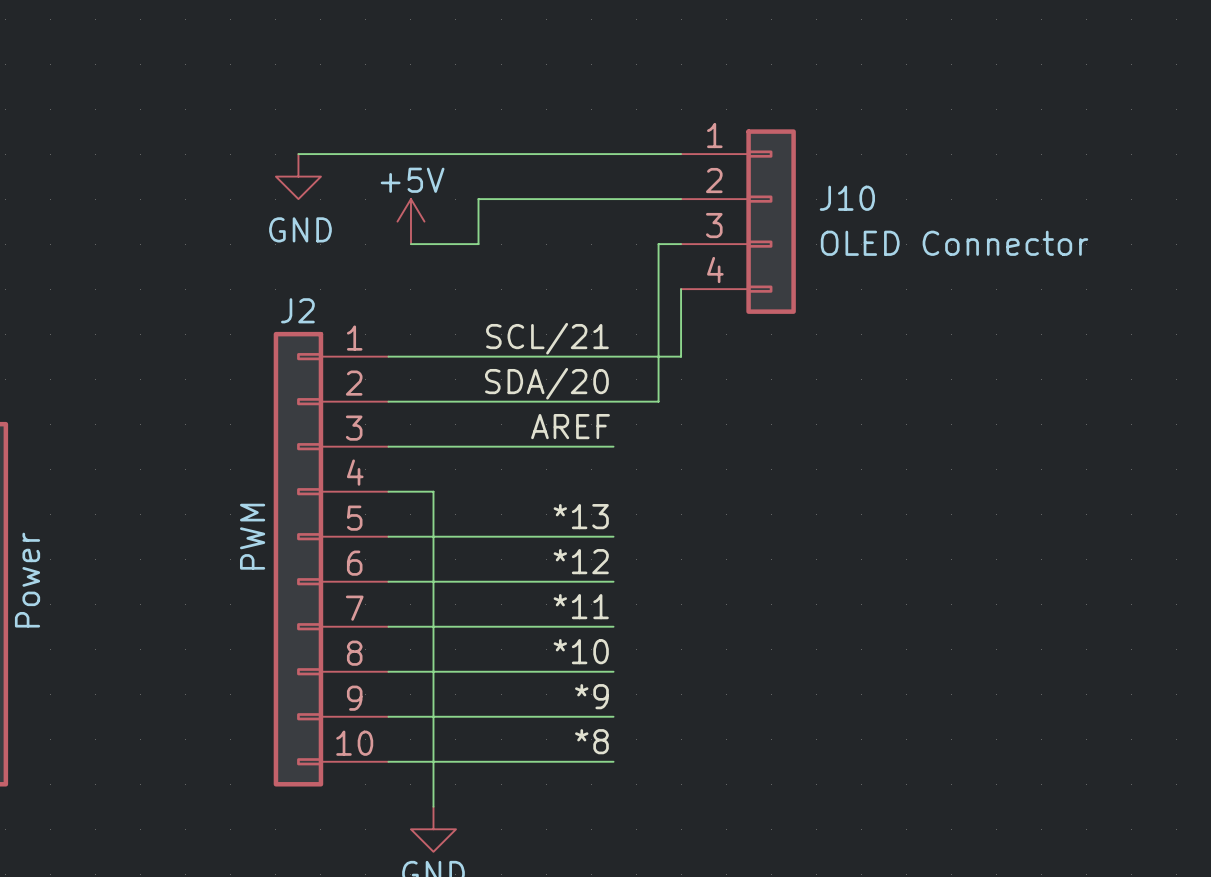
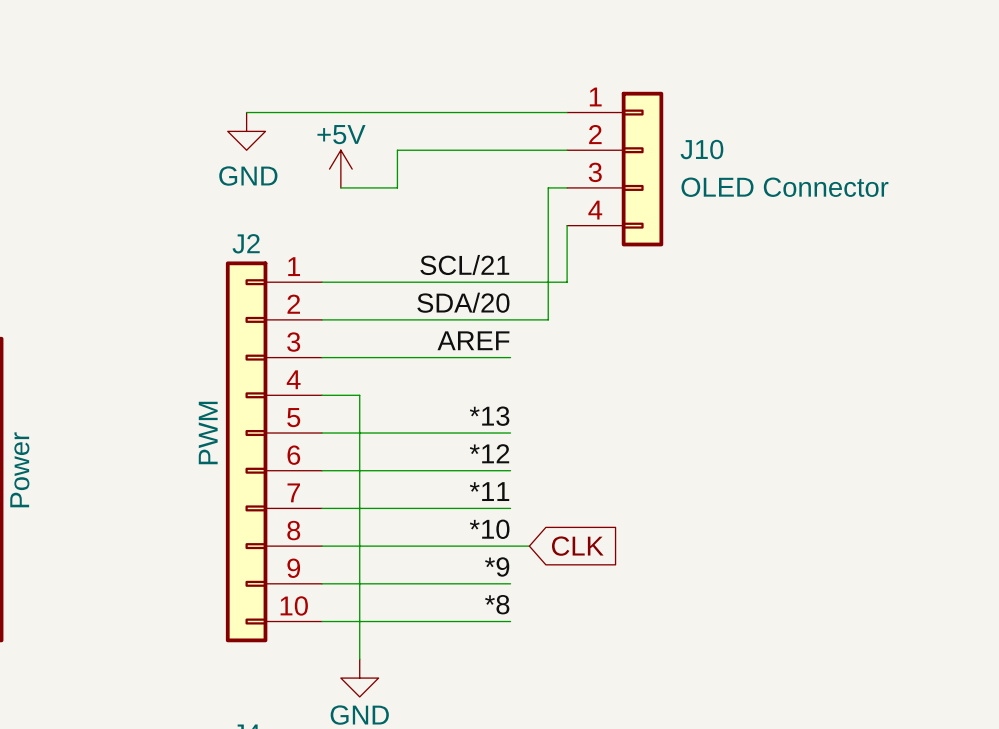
wire: none -> (510, 546) (529, 546)
global label: none -> CLK (577, 546)

